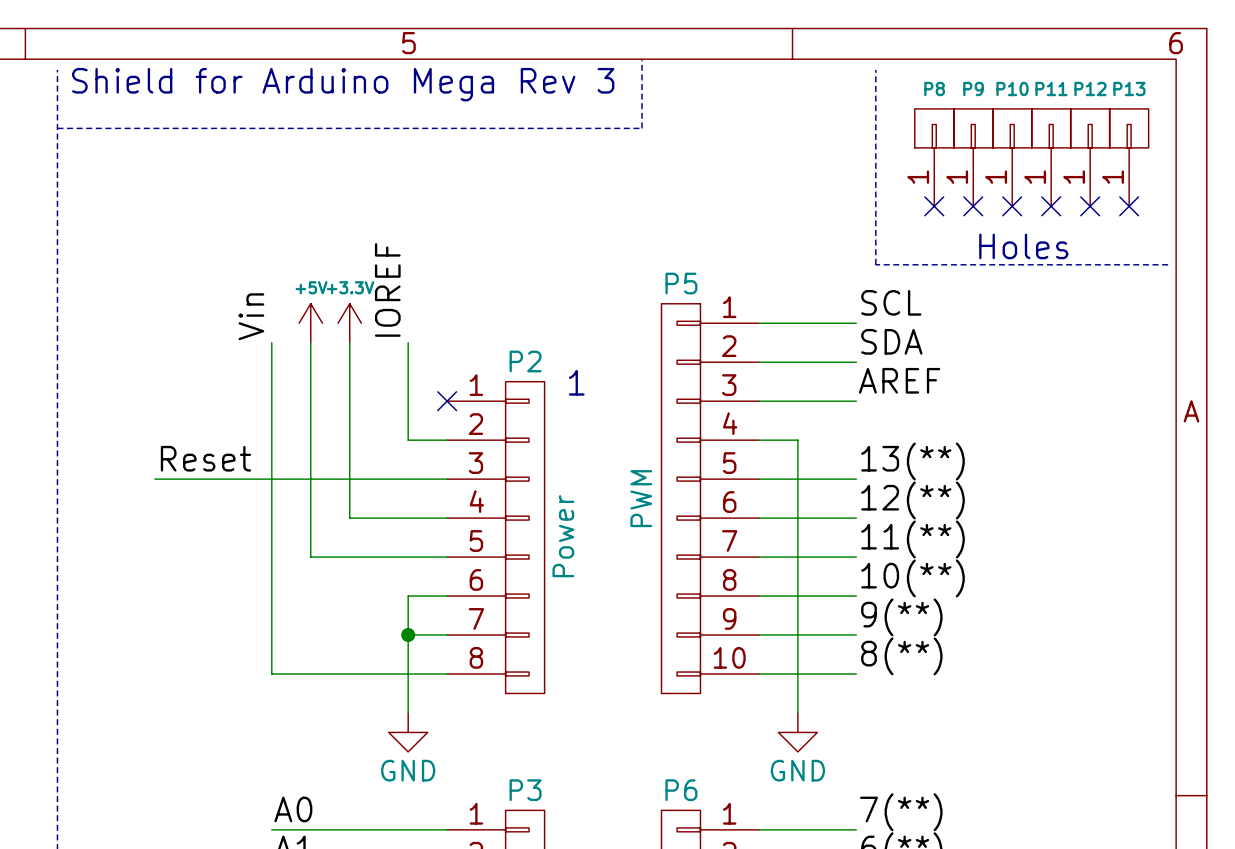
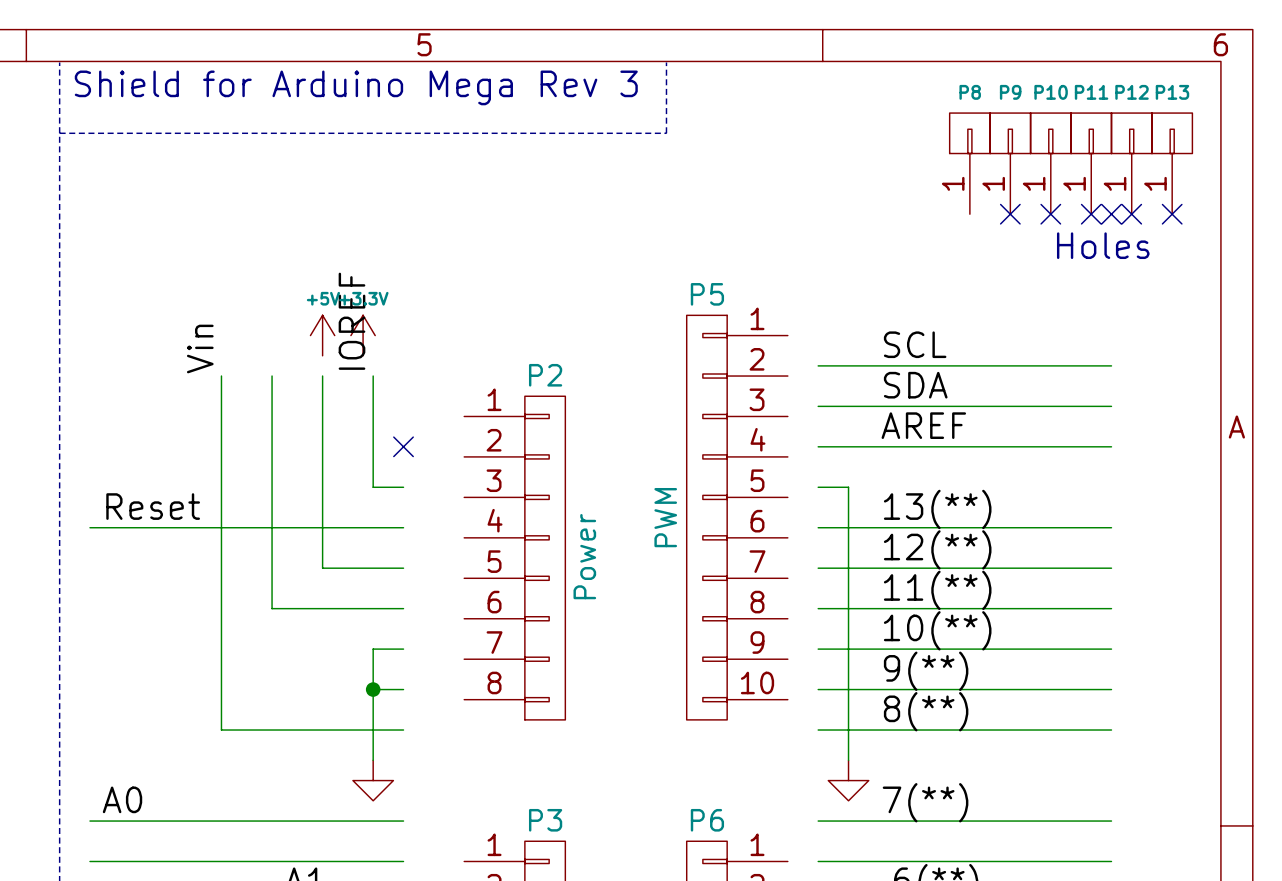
line: none -> (59, 62) (59, 72)
line: (875, 69) (875, 264) (1168, 264) -> none
no-connect mark: (934, 206) -> none
no-connect mark: none -> (1111, 214)
text position: Holes (1023, 246) -> Holes (1103, 245)
label position: IOREF (387, 289) -> IOREF (352, 321)
label position: SCL (891, 302) -> SCL (915, 344)
label position: Vin (251, 316) -> Vin (200, 349)
wire: (758, 323) (856, 323) -> none
label position: SDA (891, 341) -> SDA (915, 385)
wire: (271, 342) (271, 673) (447, 673) -> none
wire: (310, 342) (310, 362) -> none
wire: (349, 342) (349, 518) (447, 518) -> none
wire: (408, 342) (408, 440) (447, 440) -> none
wire: none -> (818, 365) (1111, 365)
wire: none -> (221, 376) (221, 730) (403, 730)
wire: none -> (272, 376) (272, 608) (403, 608)
wire: none -> (373, 376) (373, 487) (403, 487)
wire: (758, 362) (856, 362) -> none
label position: AREF (899, 380) -> AREF (923, 425)
text: 1 (576, 382) -> none
wire: none -> (818, 406) (1111, 406)
no-connect mark position: (447, 401) -> (403, 446)
wire: (758, 401) (856, 401) -> none
wire: none -> (818, 446) (1111, 446)
wire: (758, 440) (797, 440) (797, 712) -> none
label position: Reset (205, 458) -> Reset (153, 506)
label position: 13(**) (913, 461) -> 13(**) (937, 509)
wire: none -> (818, 487) (848, 487) (848, 760)
wire: (154, 479) (447, 479) -> none
wire: (758, 479) (856, 479) -> none
label position: 12(**) (913, 500) -> 12(**) (937, 549)
wire: none -> (89, 527) (403, 527)
wire: none -> (818, 527) (1111, 527)
wire: (758, 518) (856, 518) -> none
label position: 11(**) (913, 539) -> 11(**) (937, 590)
wire: (310, 547) (310, 557) (447, 557) -> (322, 568) (403, 568)
wire: none -> (818, 568) (1111, 568)
wire: (758, 557) (856, 557) -> none
label position: 10(**) (913, 578) -> 10(**) (937, 630)
wire: none -> (818, 608) (1111, 608)
wire: (447, 596) (408, 596) (408, 712) -> none
wire: (758, 596) (856, 596) -> none
label position: 9(**) (901, 617) -> 9(**) (926, 671)
wire: none -> (403, 649) (373, 649) (373, 760)
wire: none -> (818, 649) (1111, 649)
wire: (408, 635) (447, 635) -> none
junction position: (408, 635) -> (373, 689)
wire: (758, 635) (856, 635) -> none
label position: 8(**) (901, 656) -> 8(**) (926, 711)
wire: none -> (373, 689) (403, 689)
wire: none -> (818, 689) (1111, 689)
wire: (758, 673) (856, 673) -> none
wire: none -> (818, 730) (1111, 730)
power symbol: GND (408, 732) -> none
power symbol: GND (797, 732) -> none
power symbol: none -> (373, 780)
power symbol: none -> (848, 780)
wire: none -> (89, 821) (403, 821)
wire: none -> (818, 821) (1111, 821)
label position: A0 (293, 809) -> A0 (122, 799)
label position: 7(**) (901, 812) -> 7(**) (925, 802)
wire: none -> (89, 861) (282, 861)
wire: (388, 829) (447, 829) -> none
wire: (758, 829) (788, 829) -> none
wire: none -> (888, 861) (1111, 861)

